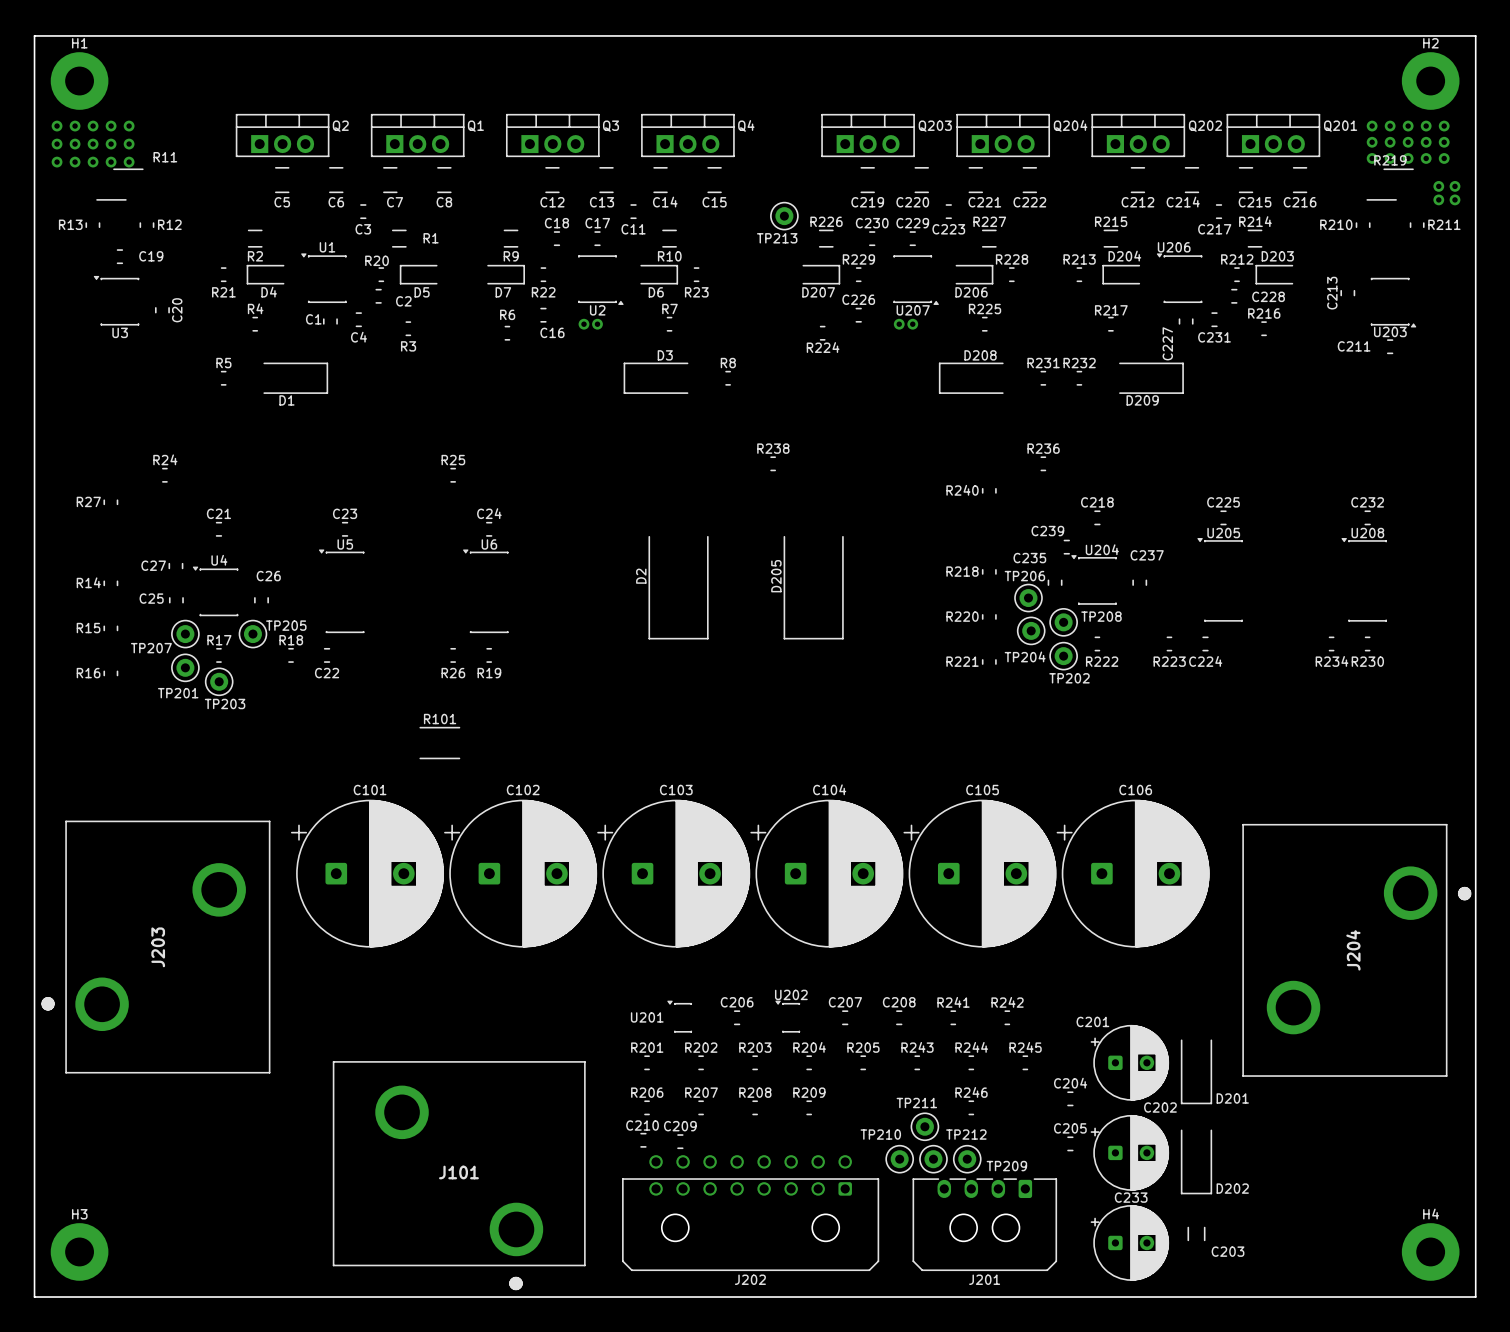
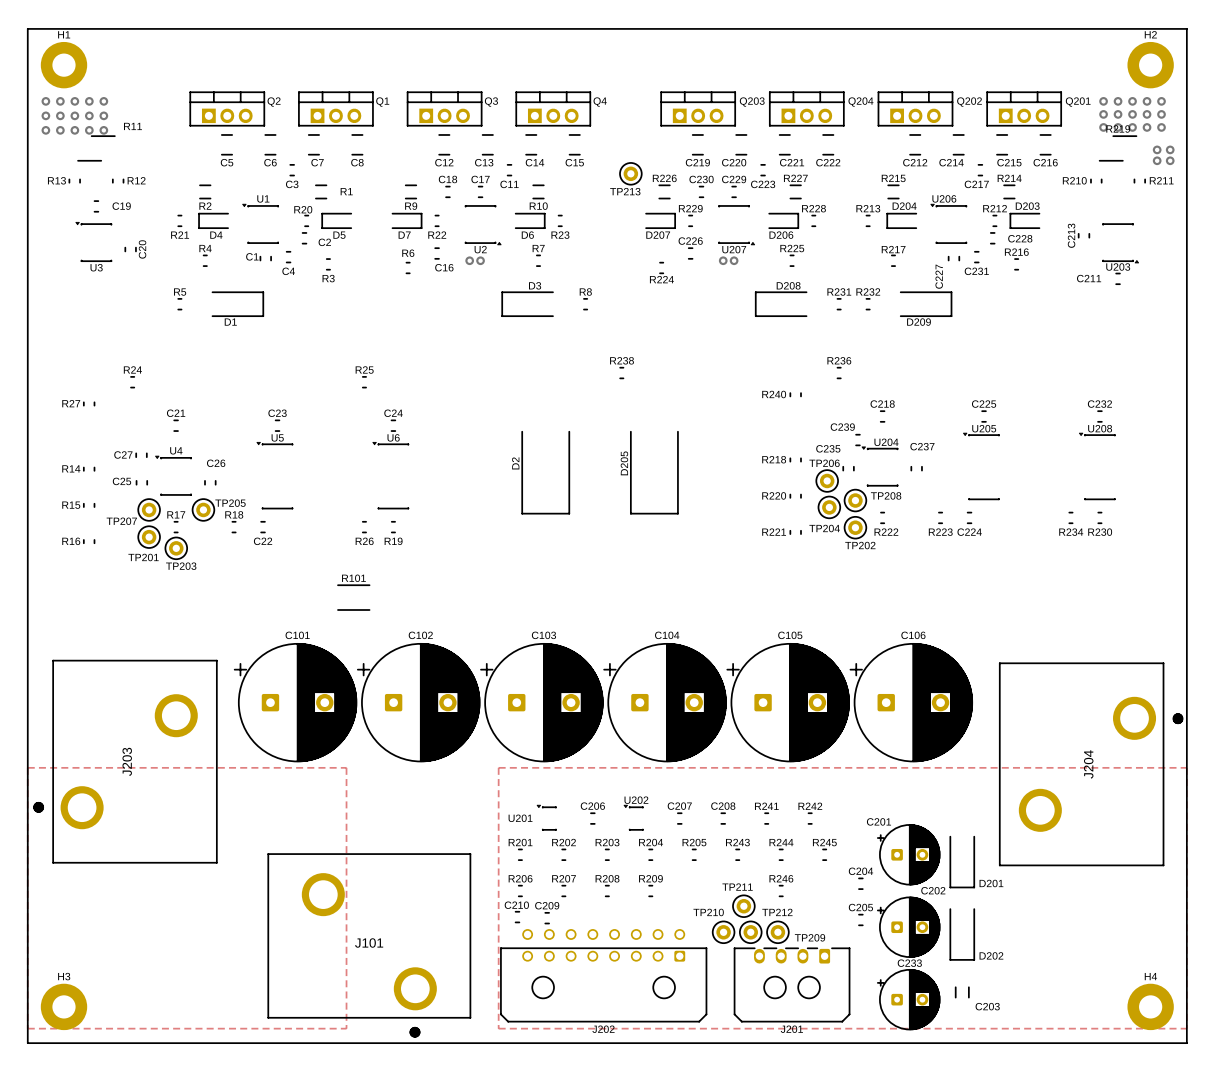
zone outline: none -> (27, 767) (27, 1028) (346, 1028) (346, 767) (27, 767)
zone outline: none -> (498, 767) (1186, 767) (1186, 1028) (498, 1028) (498, 767)

